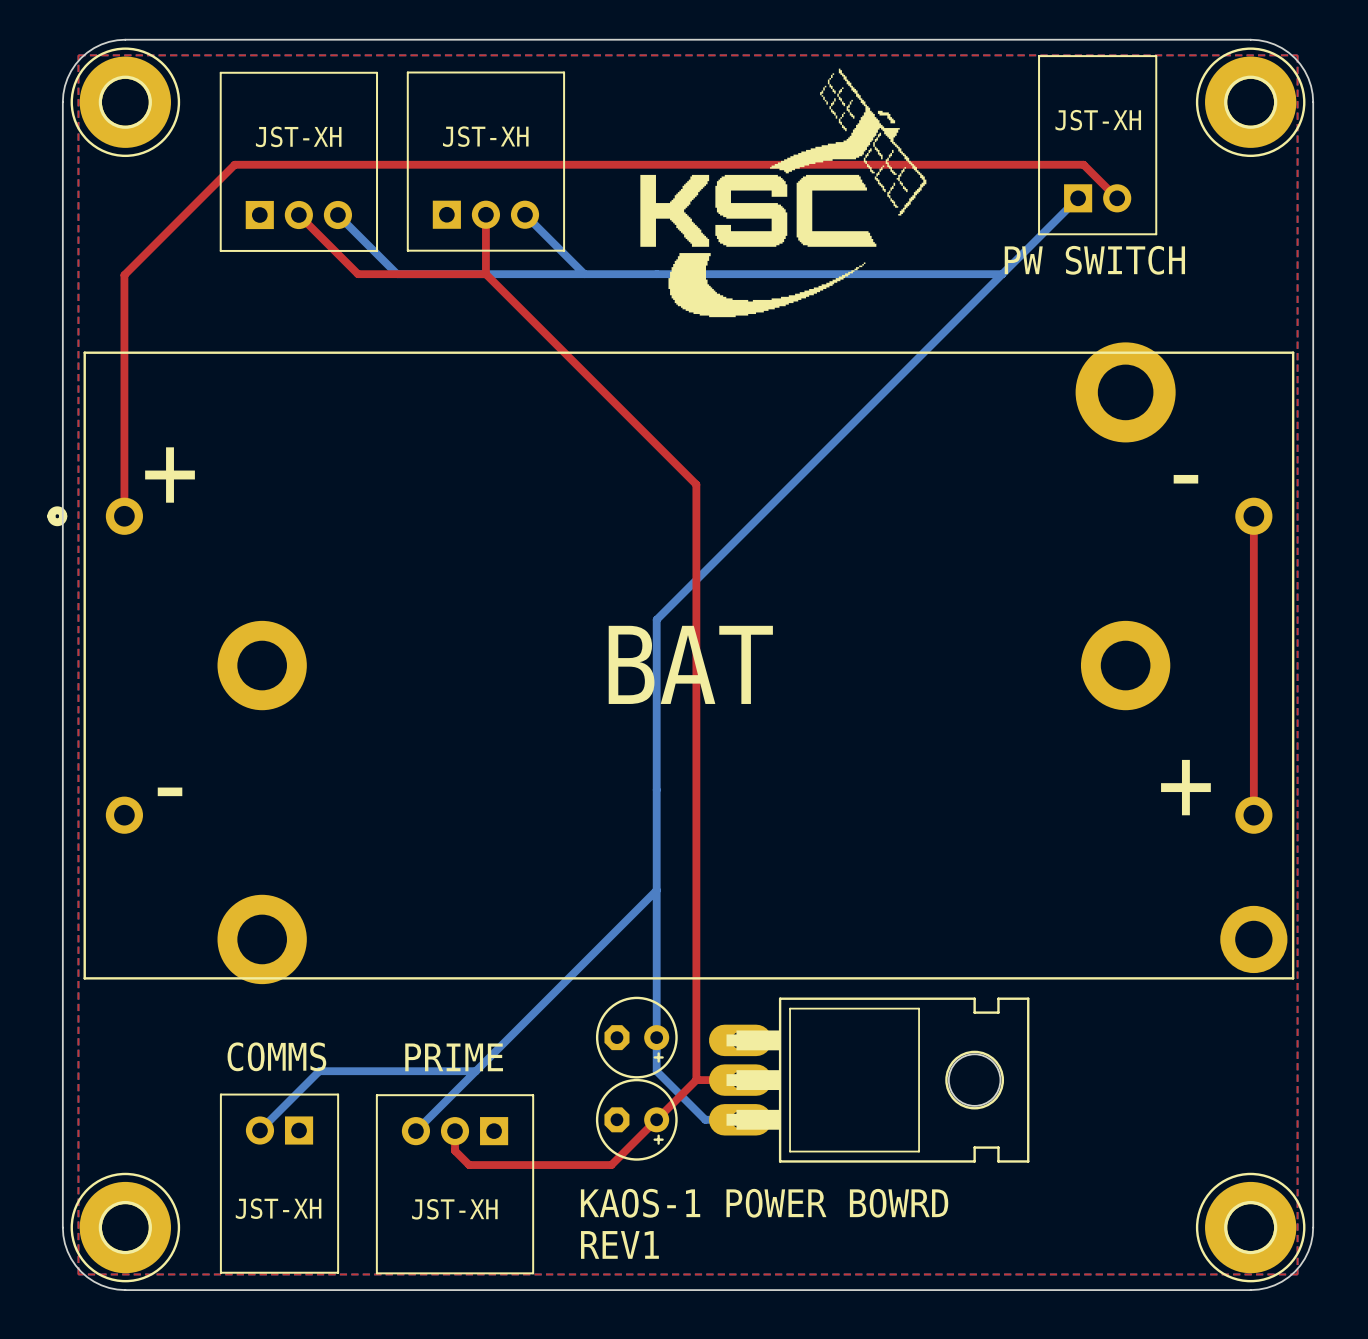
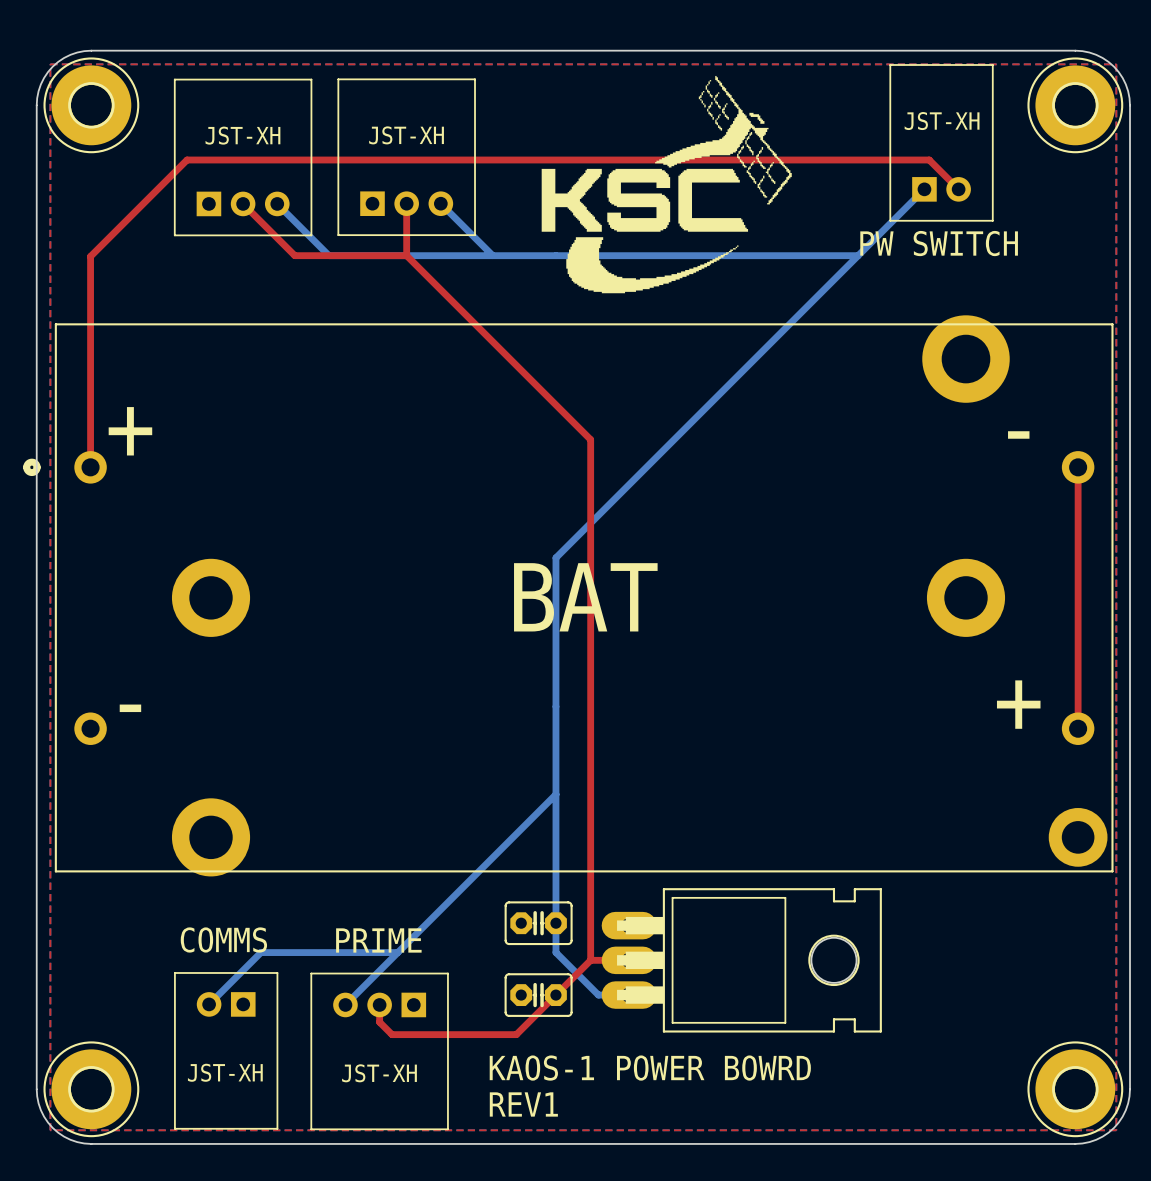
part footprint: [595, 996, 678, 1079] -> [504, 901, 573, 946]
part footprint: [595, 1078, 678, 1161] -> [504, 973, 573, 1017]

